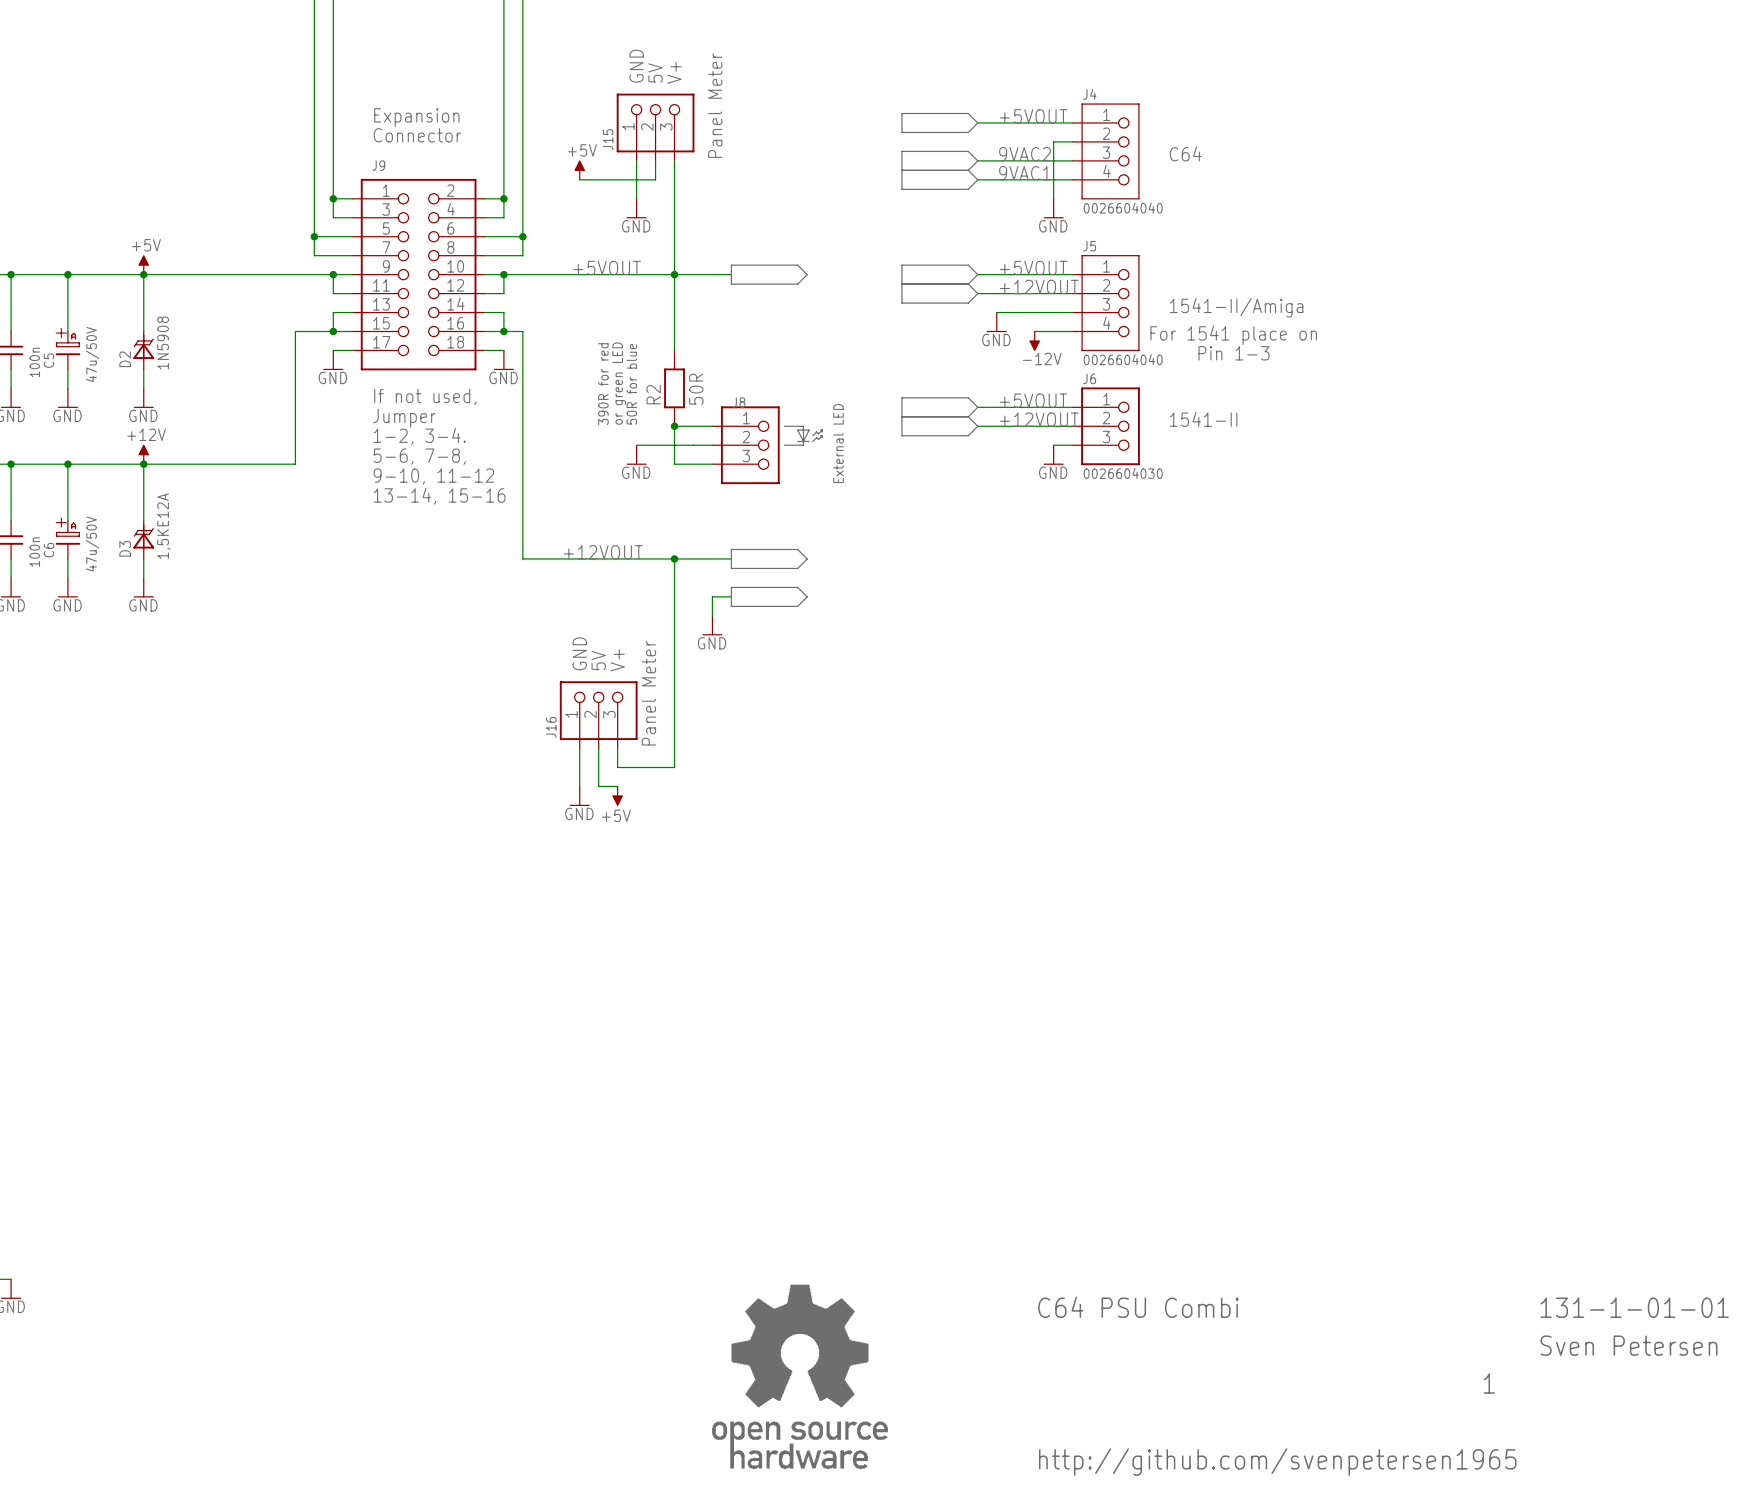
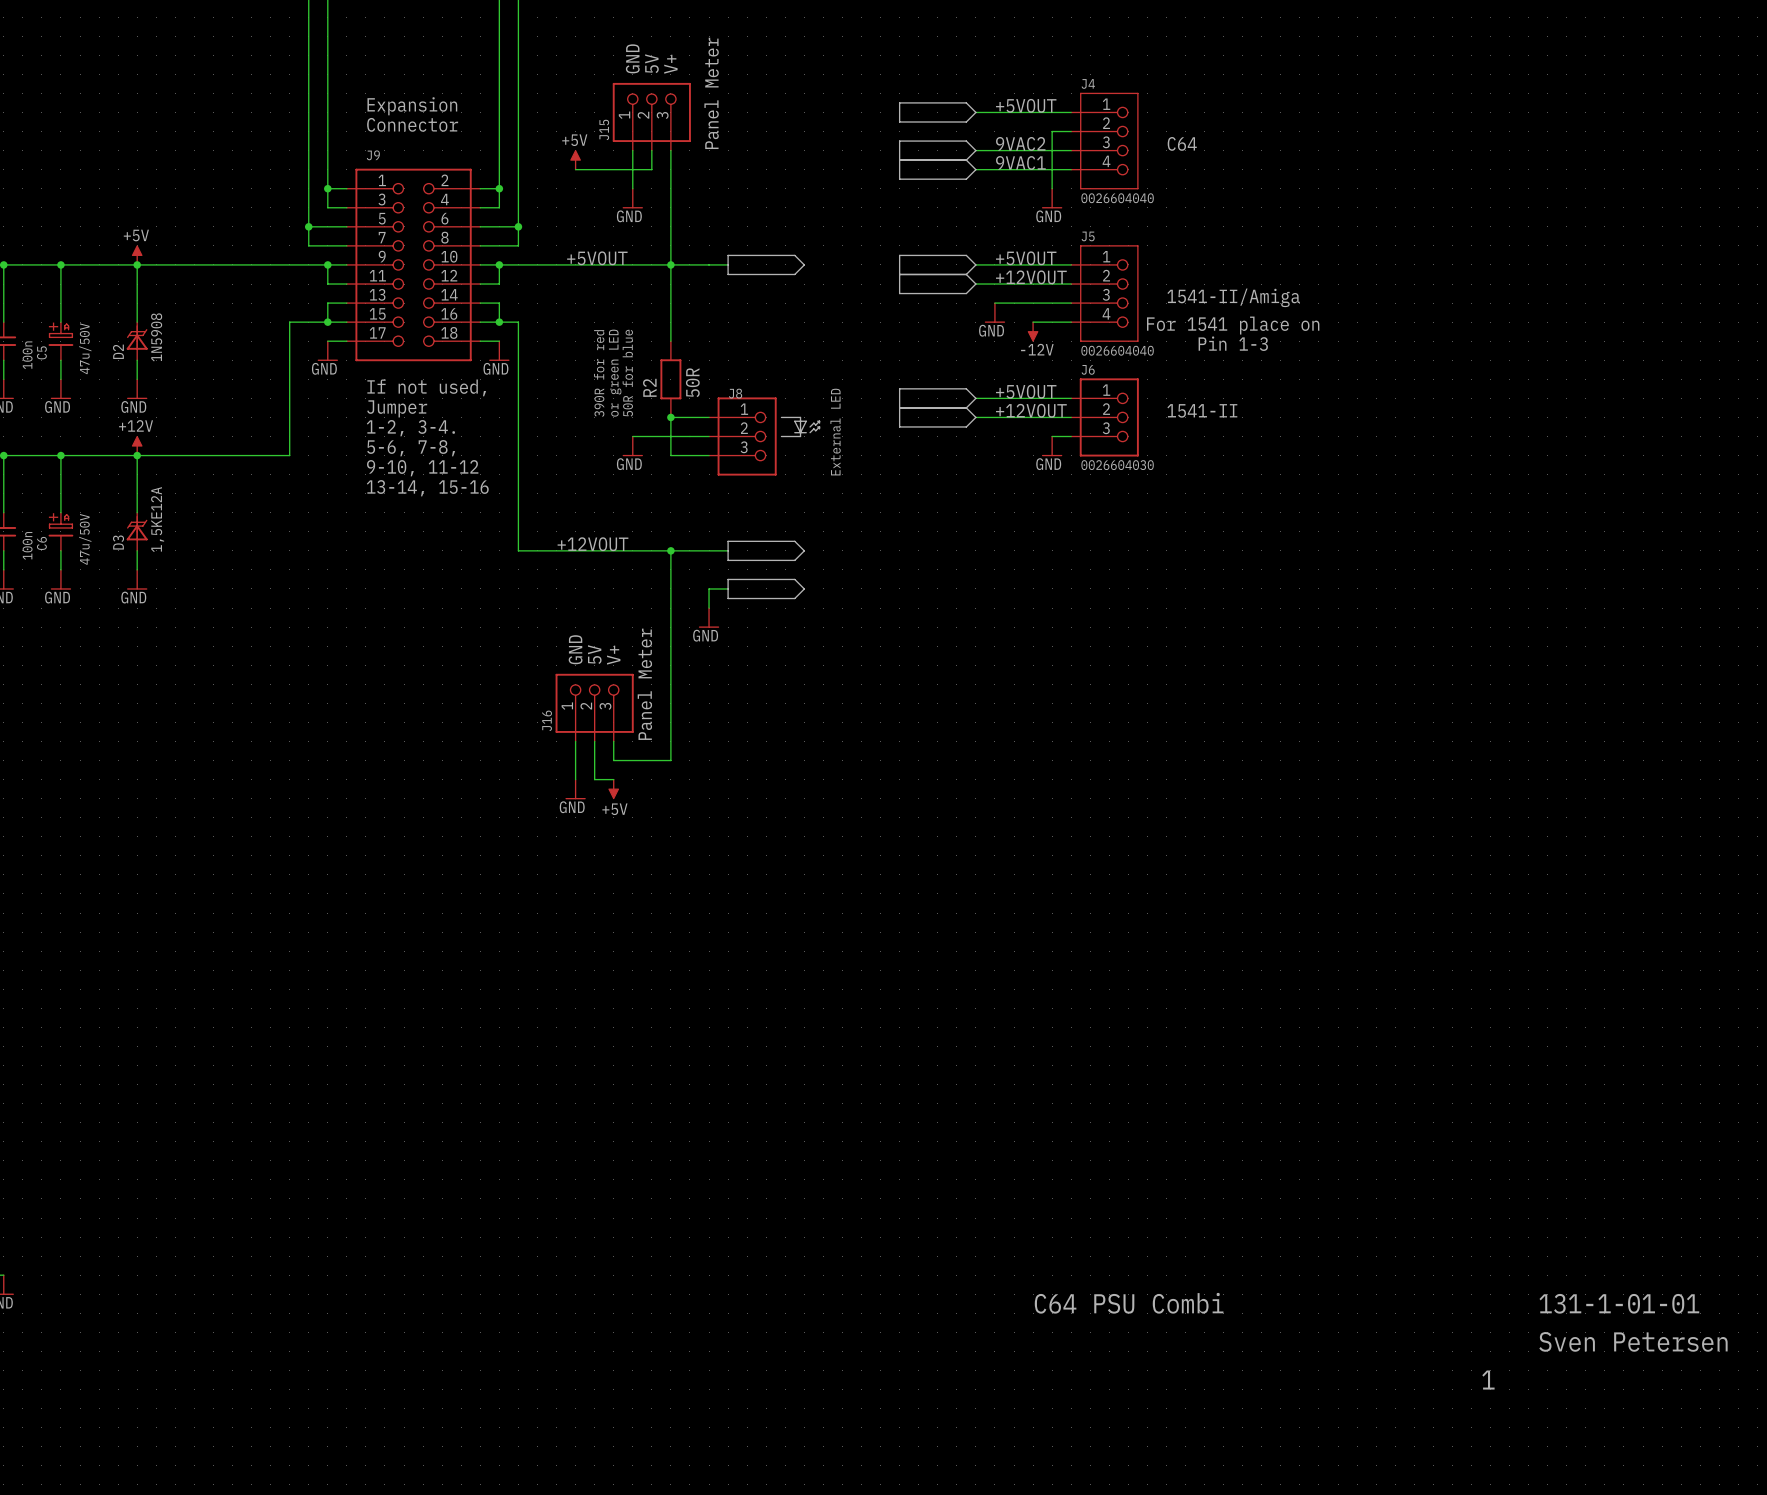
part: (800, 1376) -> none
text: http://github.com/svenpetersen1965 (1277, 1462) -> none

